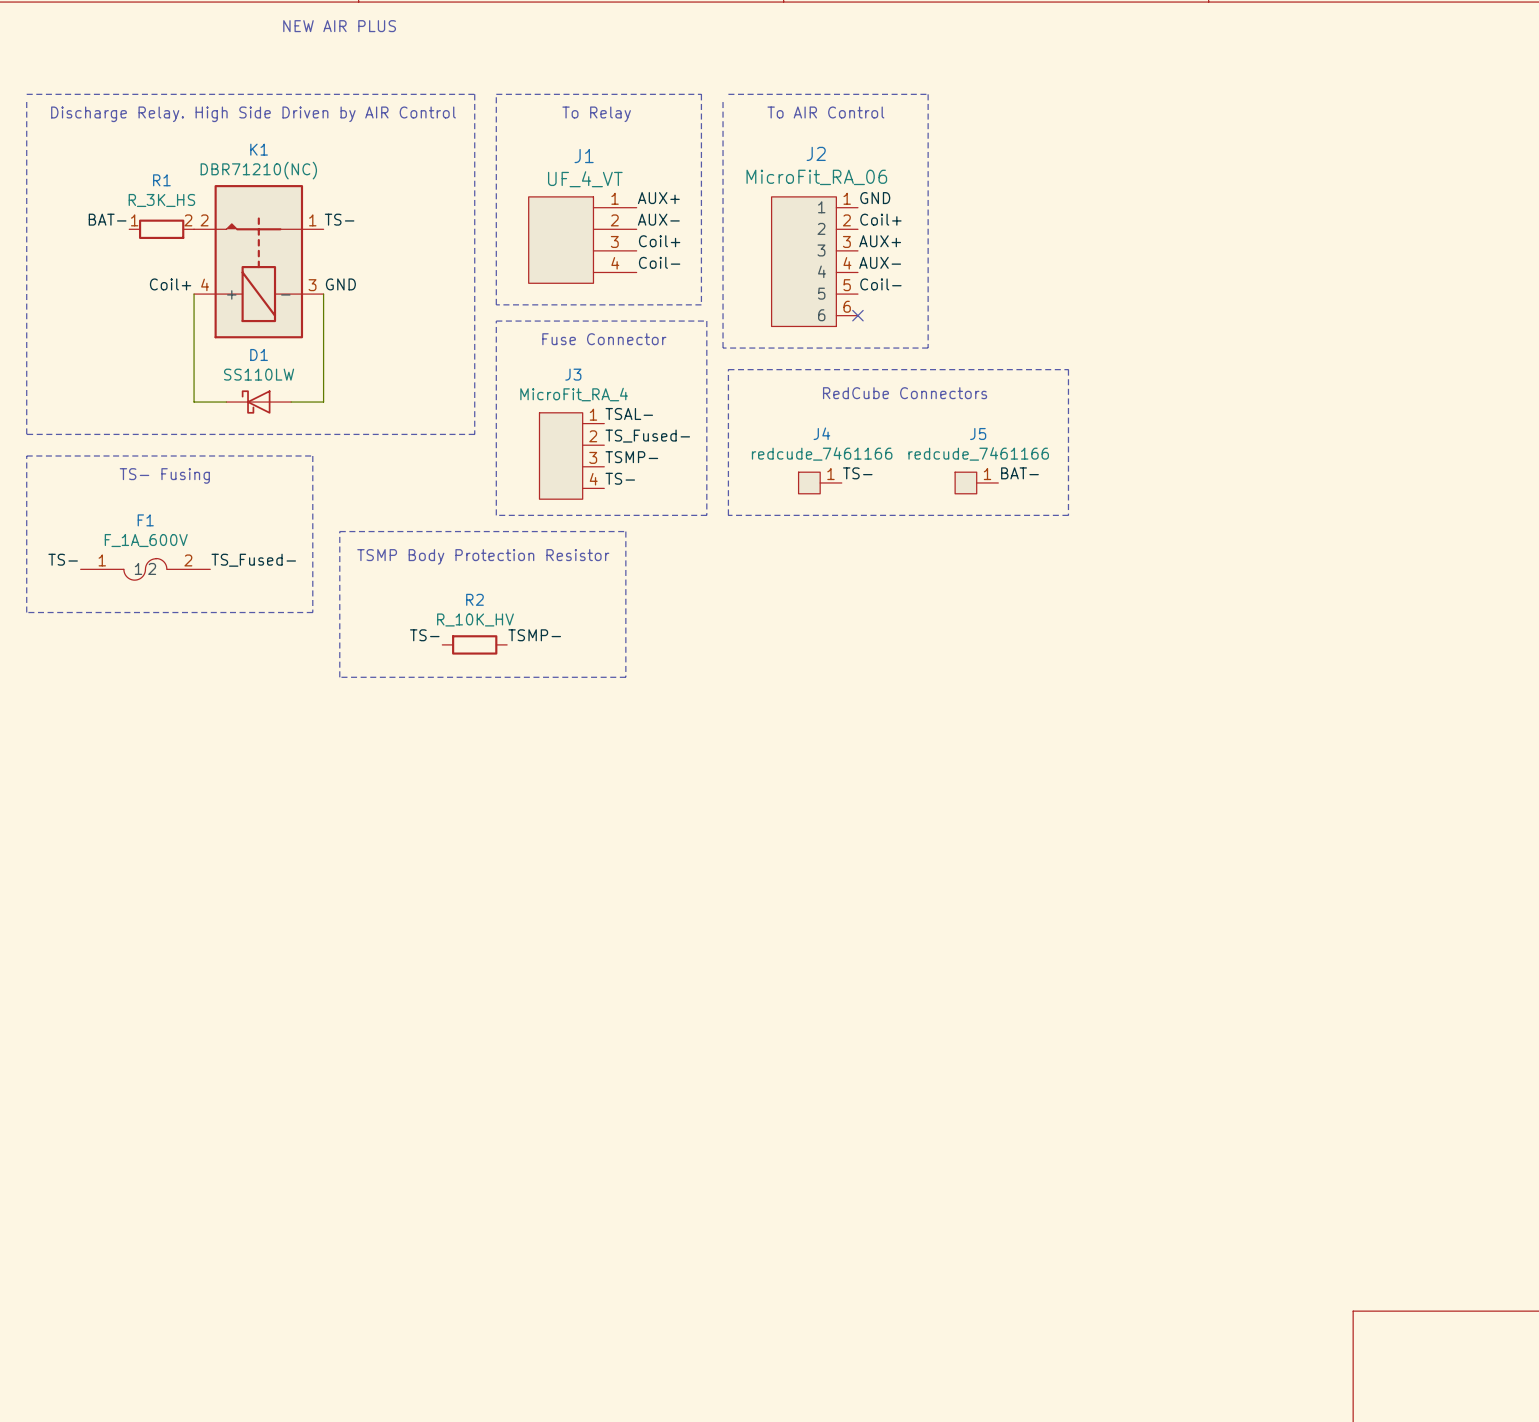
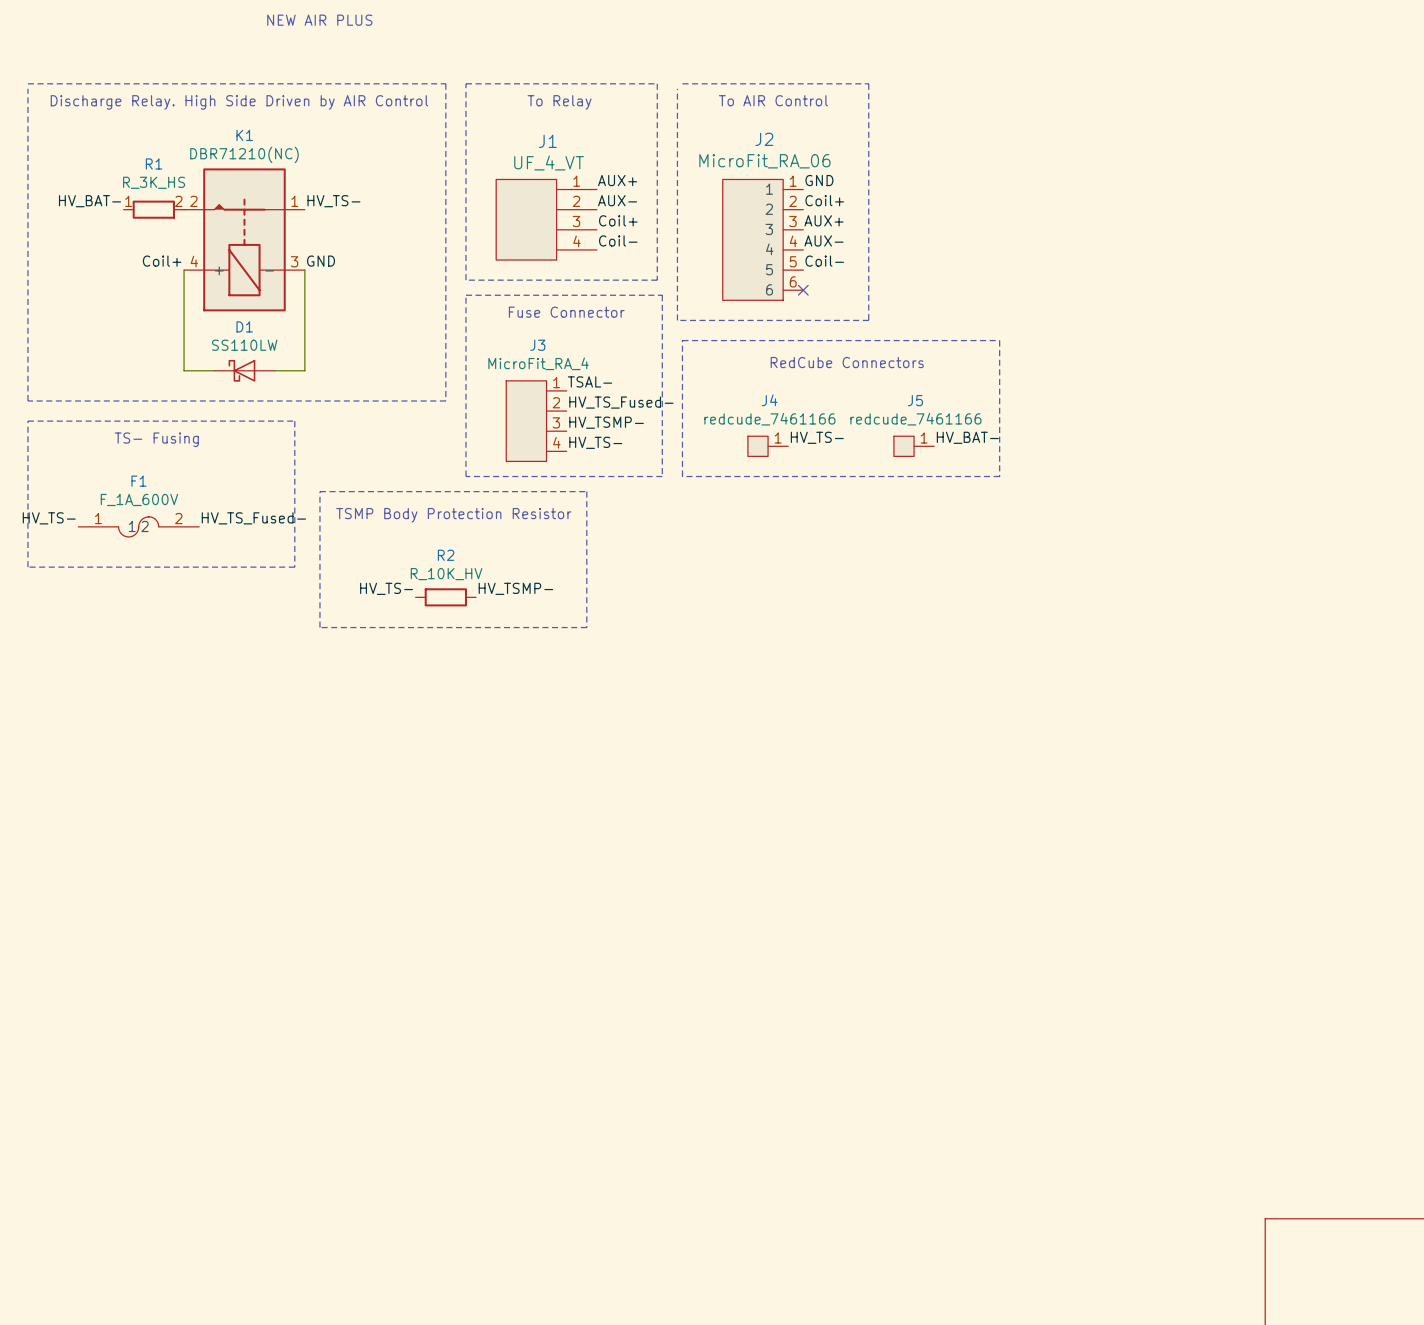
label: BAT- (107, 219) -> HV_BAT- (89, 201)
label: TS- (339, 219) -> HV_TS- (333, 201)
label: TS_Fused- (647, 436) -> HV_TS_Fused- (621, 402)
label: TSMP- (631, 457) -> HV_TSMP- (606, 422)
label: TS- (857, 473) -> HV_TS- (817, 437)
label: BAT- (1019, 473) -> HV_BAT- (967, 437)
label: TS- (620, 478) -> HV_TS- (595, 442)
label: TS- (63, 559) -> HV_TS- (49, 518)
label: TS_Fused- (253, 560) -> HV_TS_Fused- (253, 518)
label: TS- (424, 635) -> HV_TS- (386, 588)
label: TSMP- (534, 635) -> HV_TSMP- (515, 588)

